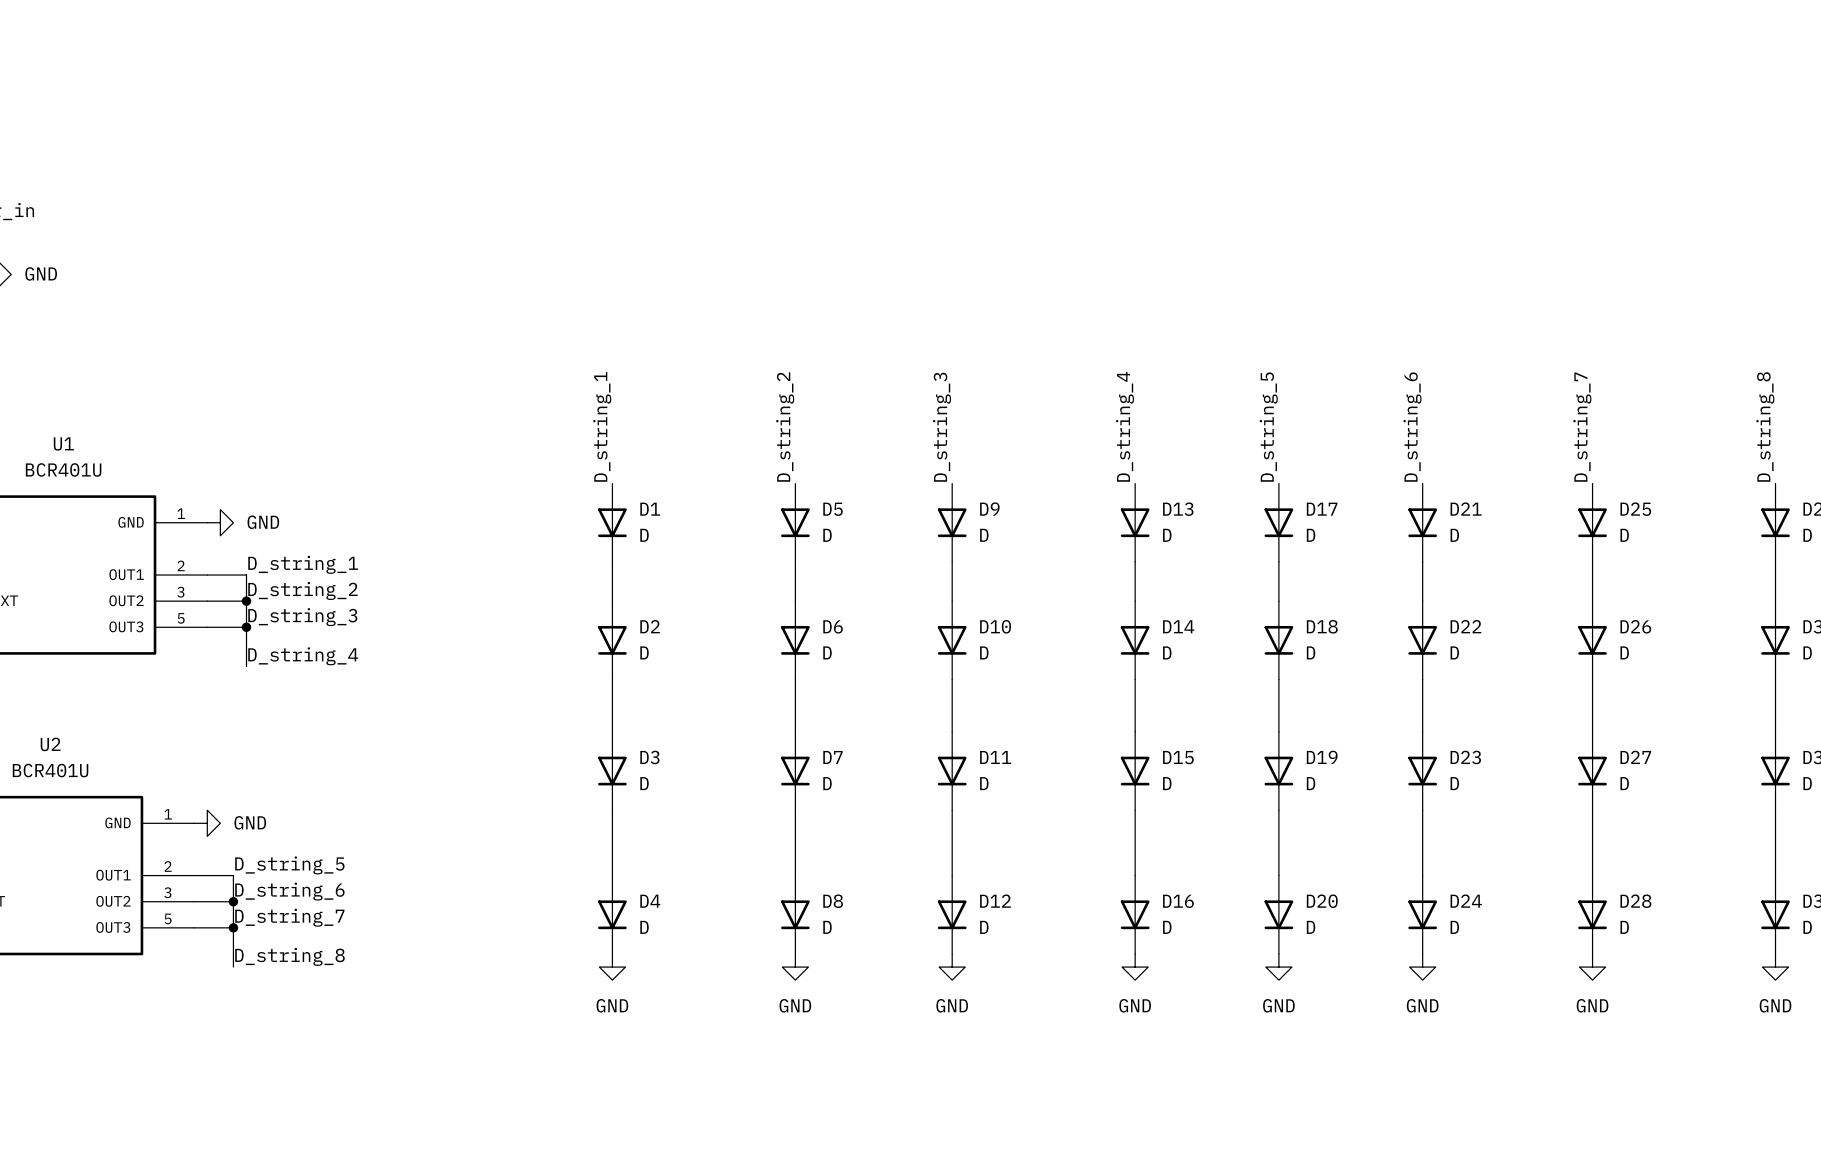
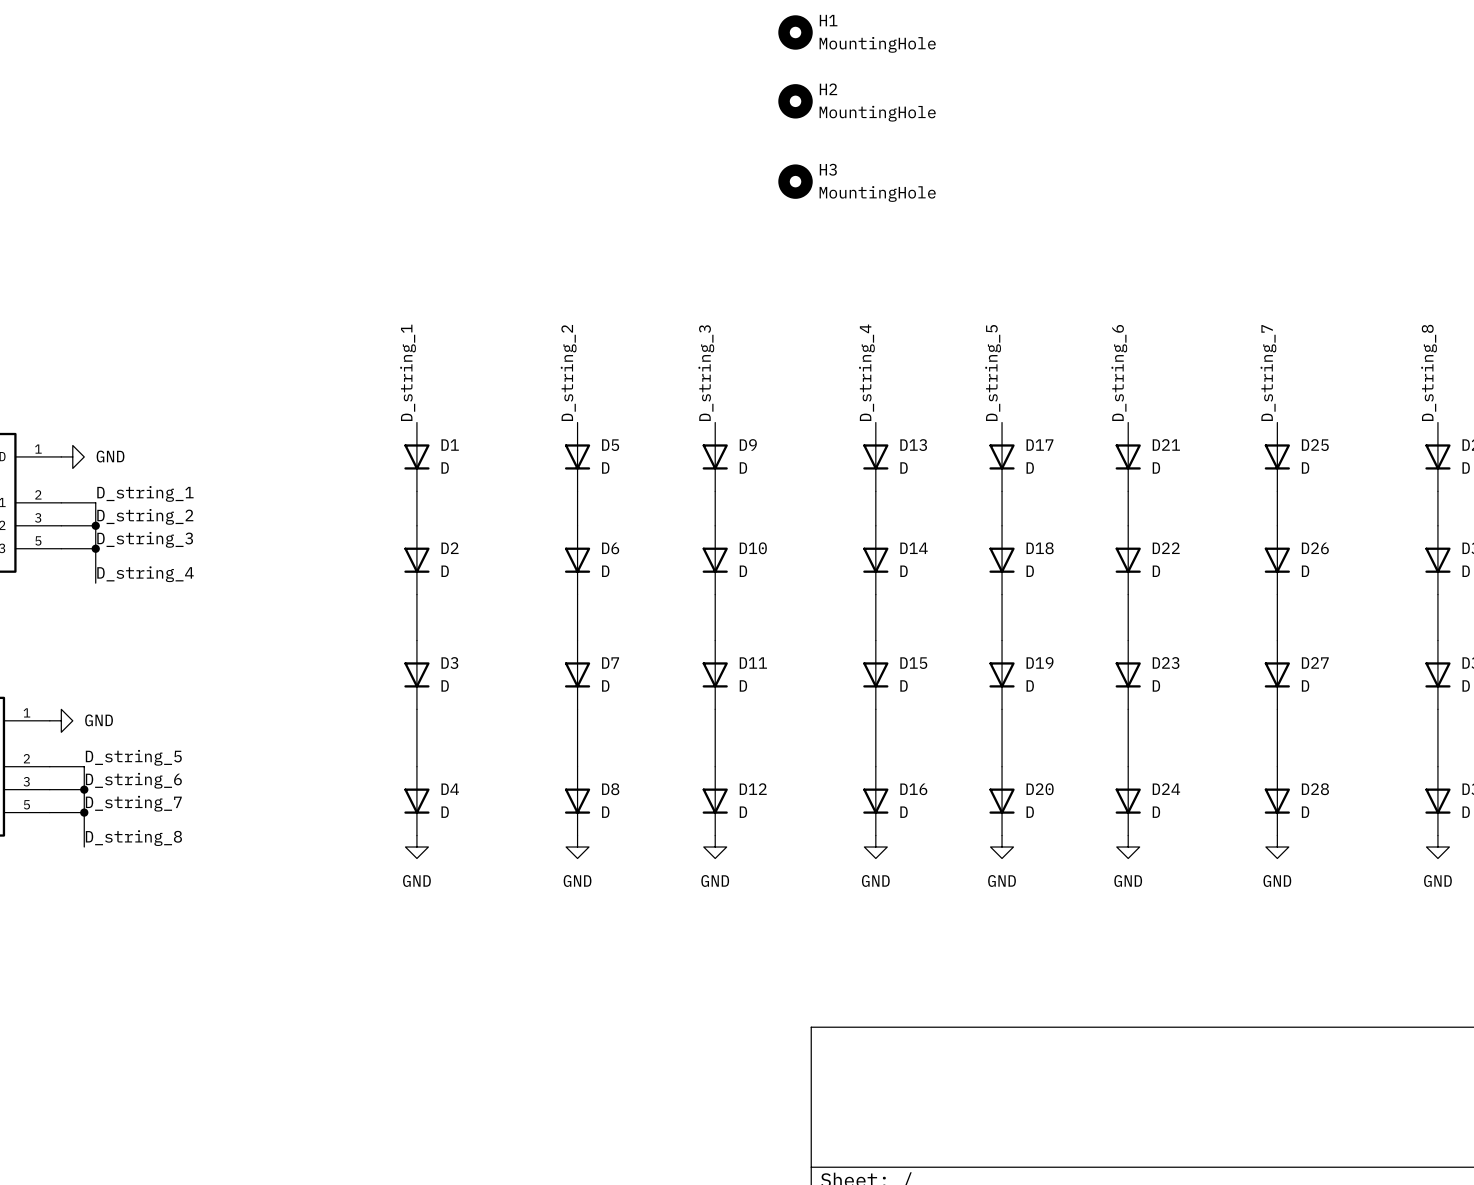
H1: none -> MountingHole (795, 32)
H2: none -> MountingHole (795, 101)
H3: none -> MountingHole (795, 181)

